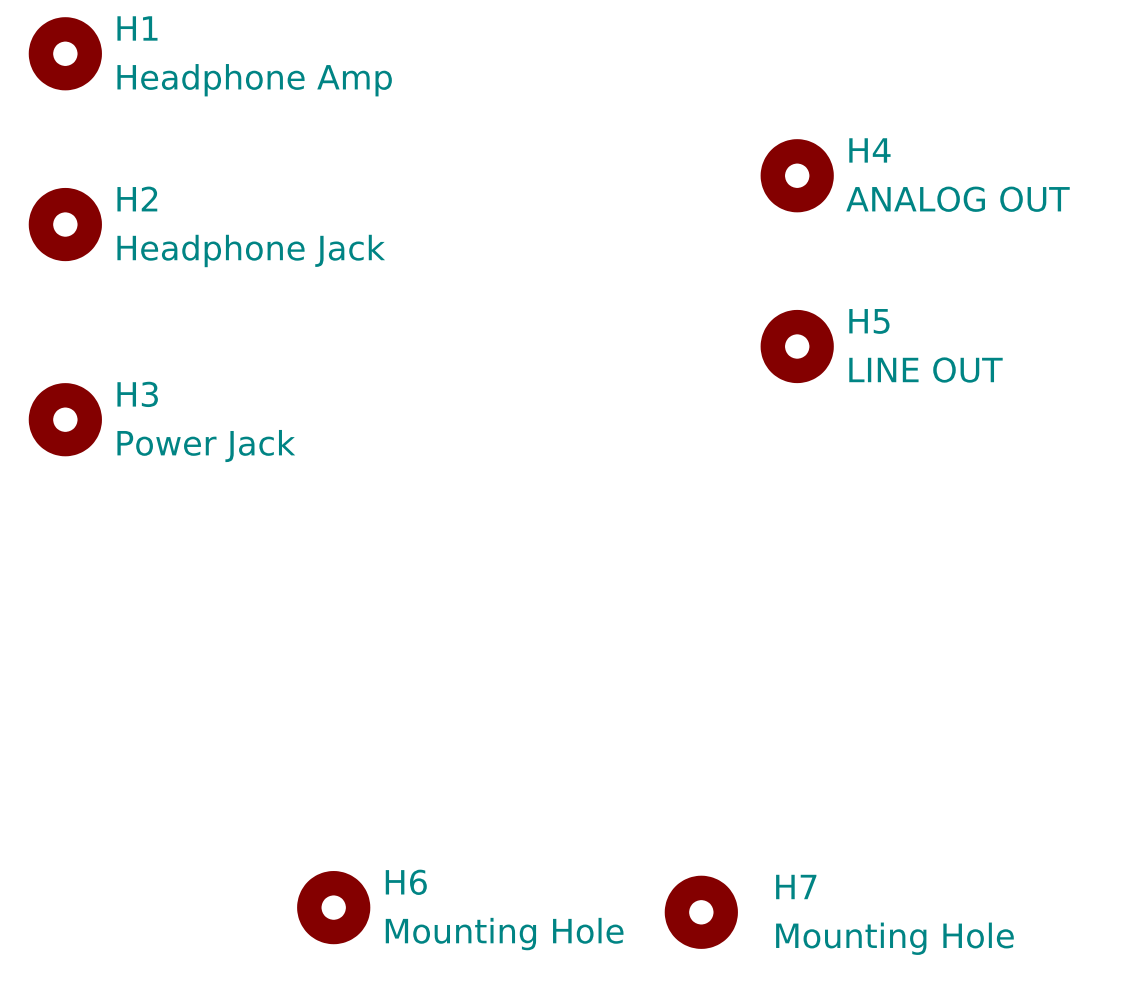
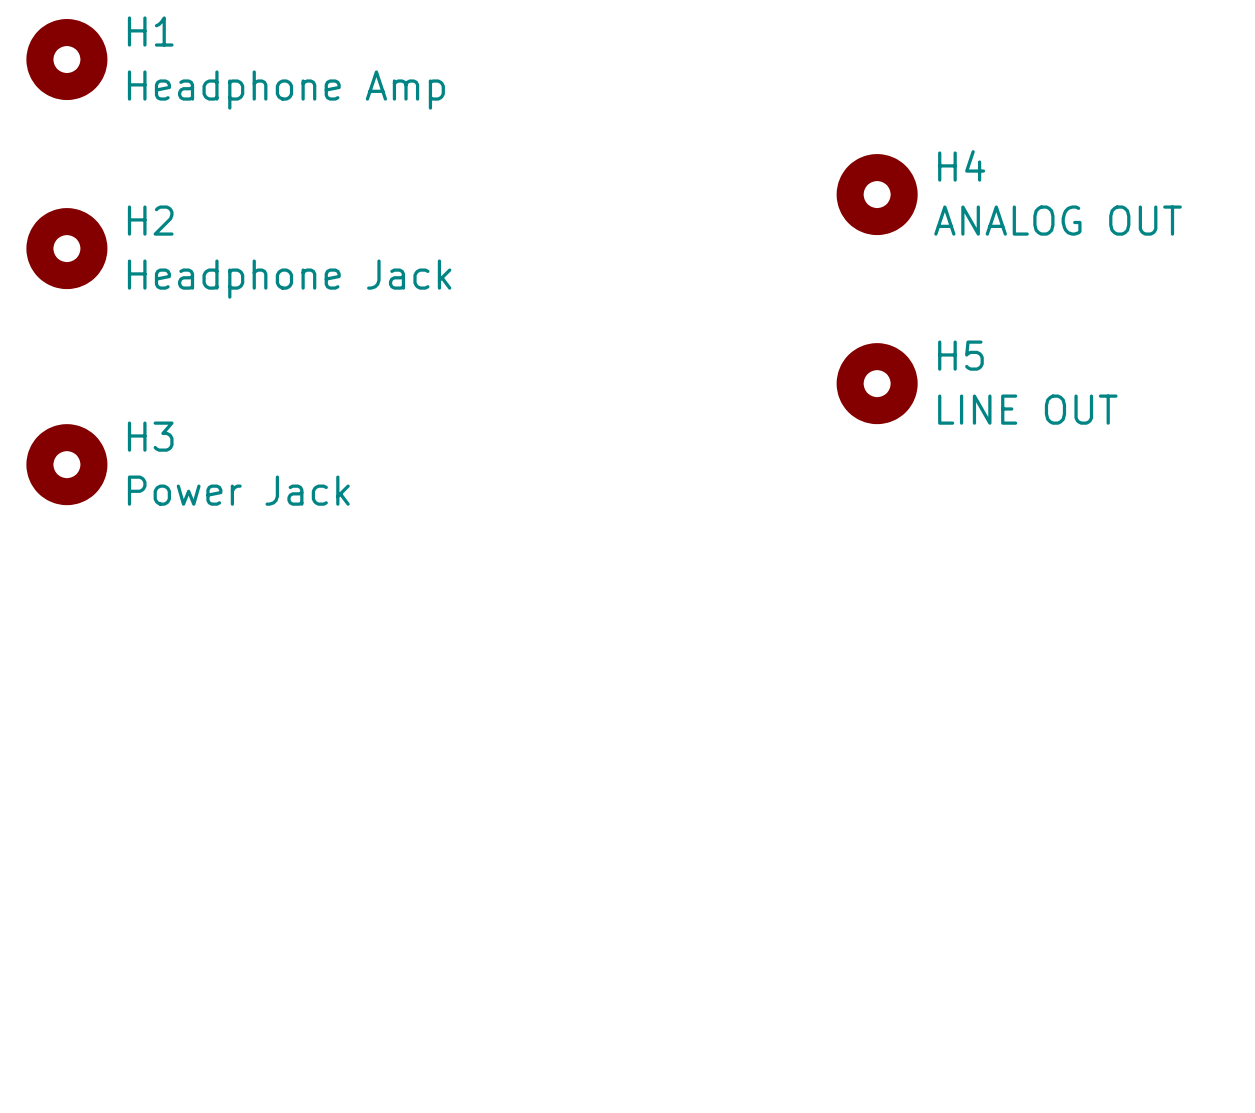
H6: Mounting Hole (333, 907) -> none
H7: Mounting Hole (701, 912) -> none

